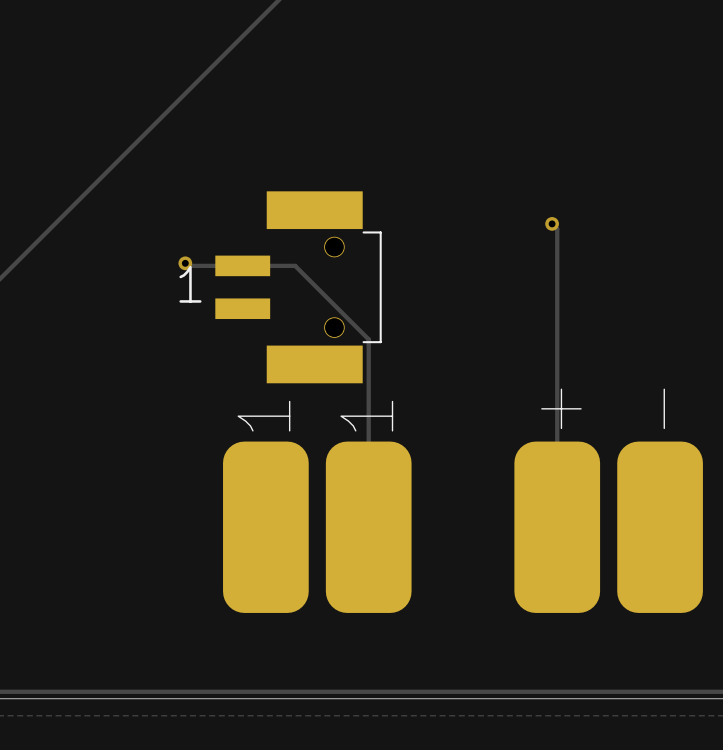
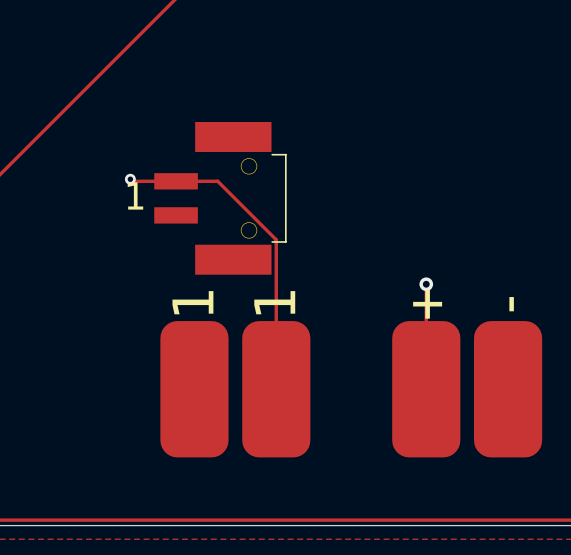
track: (552, 223) (557, 229) (557, 395) -> none
via: (552, 223) -> none
via: none -> (426, 284)

